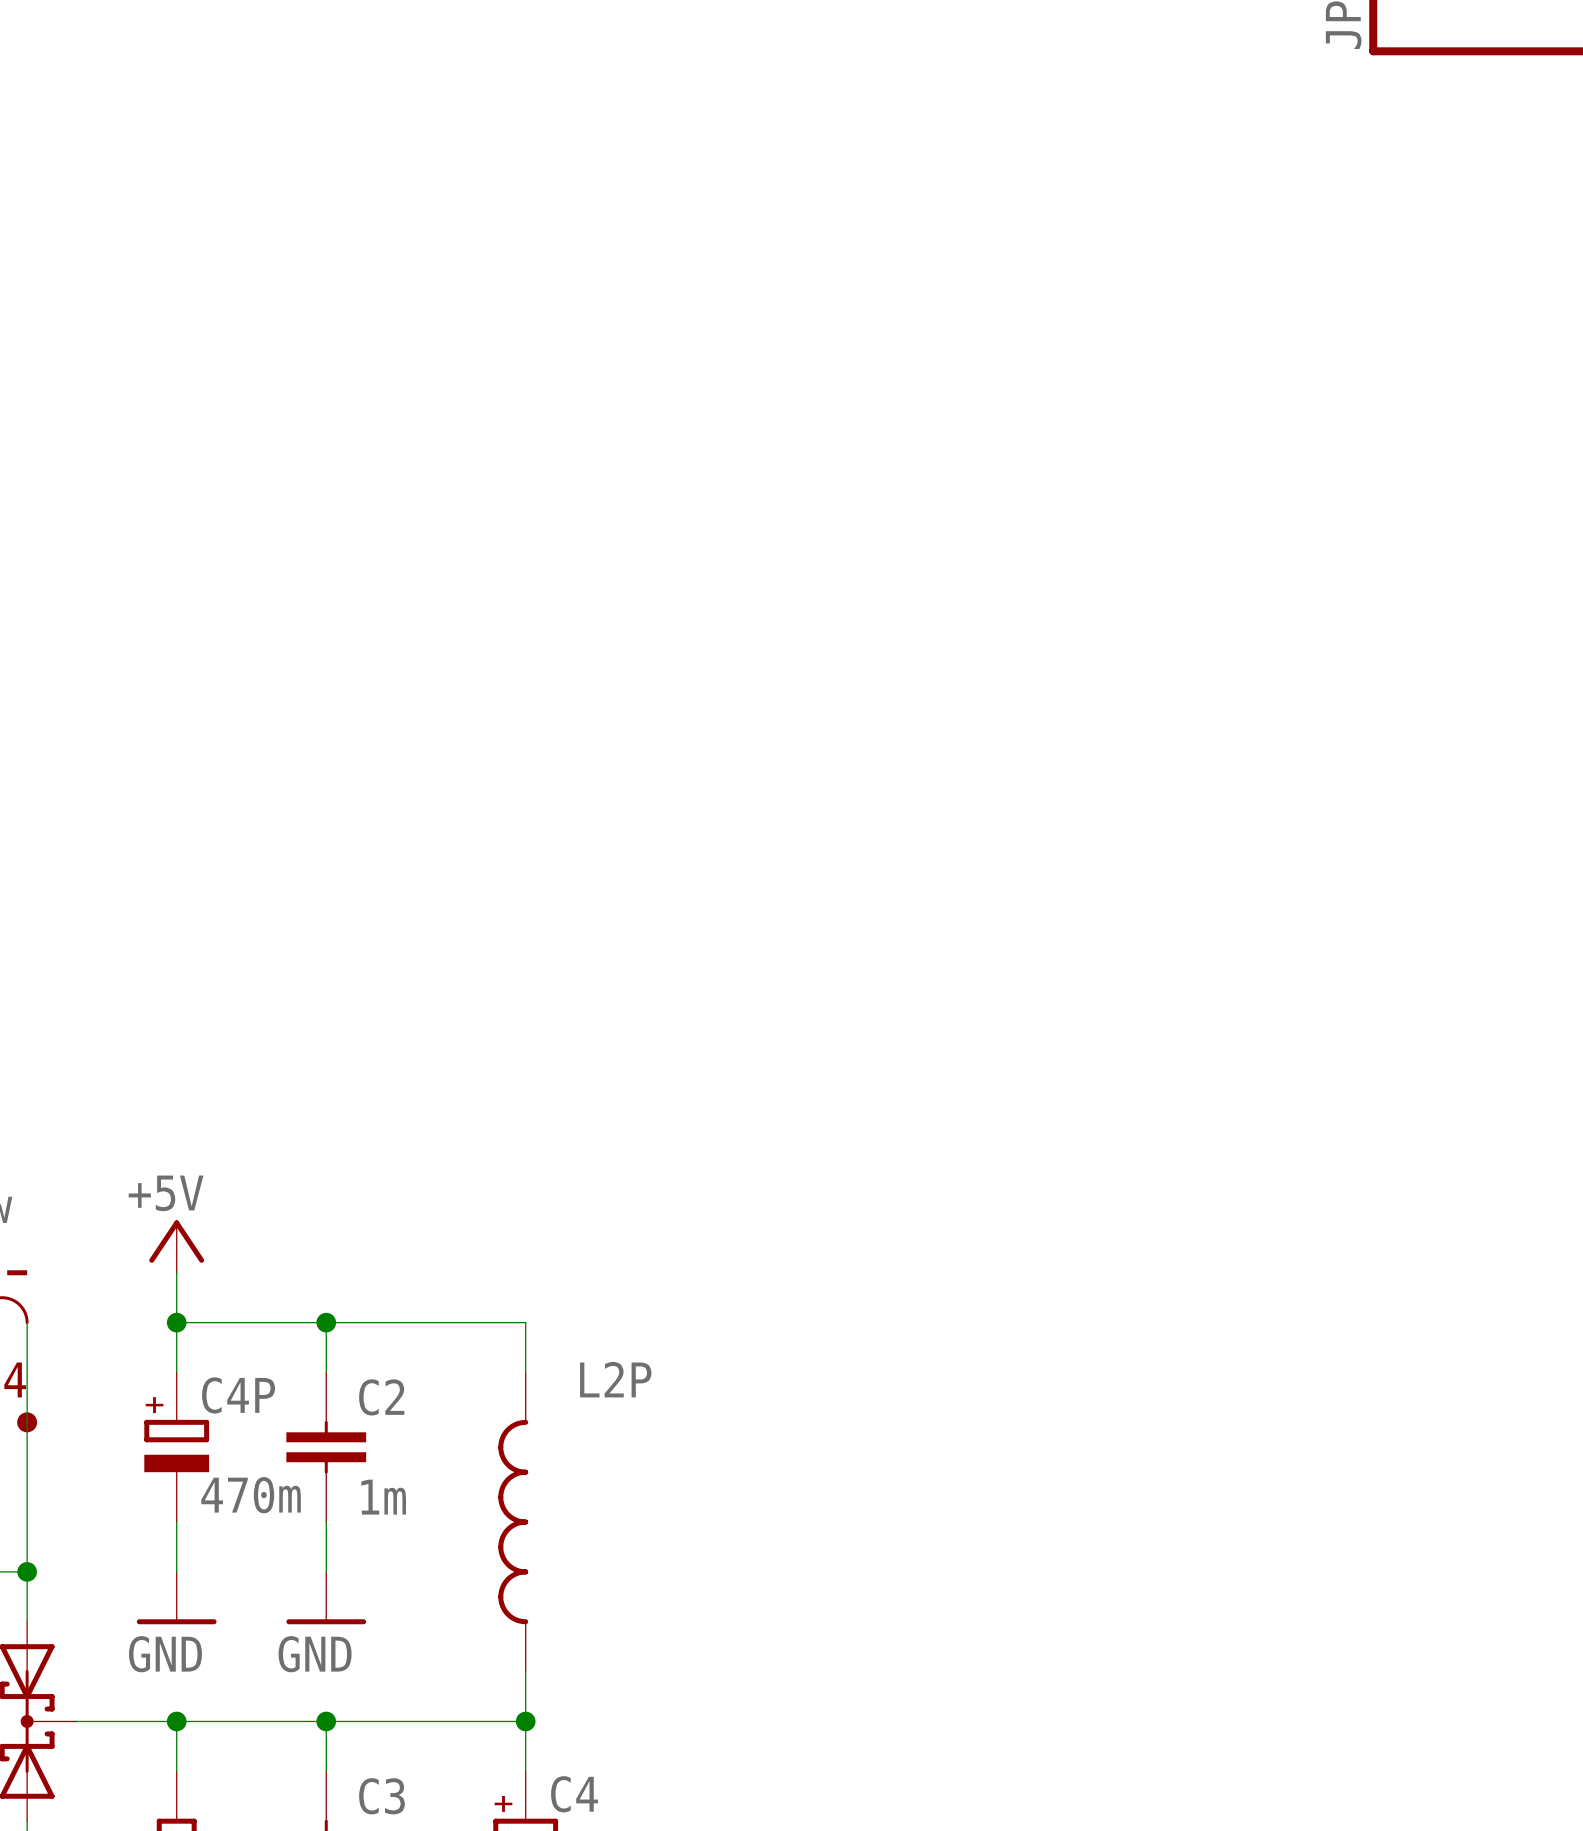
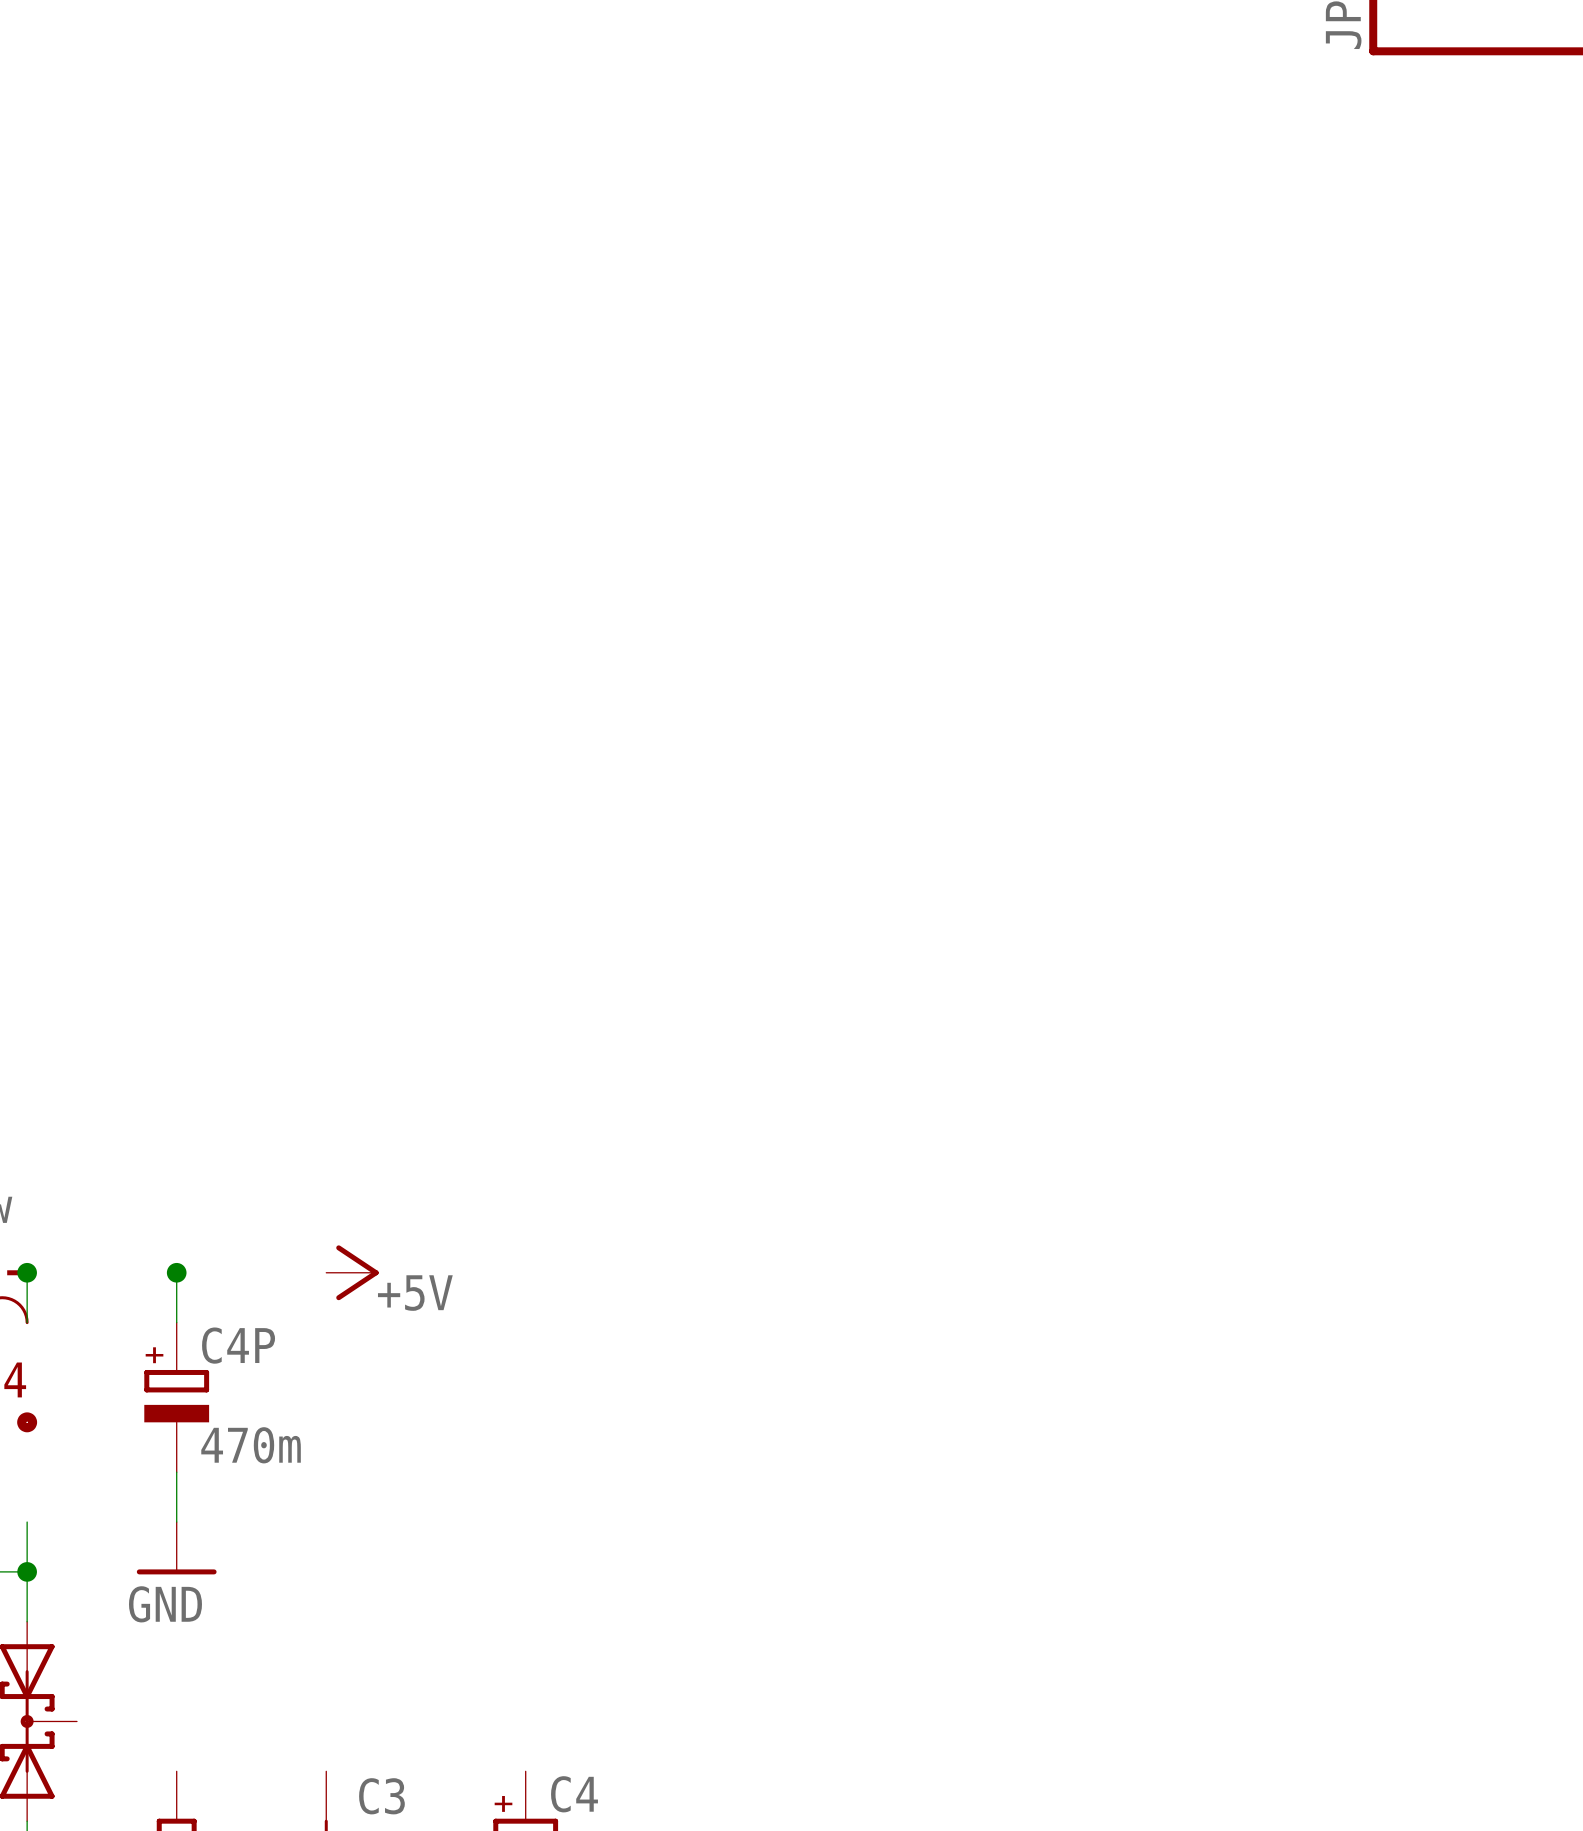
power symbol rotation: 0° (176, 1241) -> 90° clockwise (357, 1272)
power symbol position: +5V (176, 1246) -> +5V (352, 1272)
junction: none -> (27, 1272)
wire: (27, 1322) (27, 1522) -> (27, 1322) (27, 1272)
junction position: (176, 1322) -> (176, 1272)
wire: (326, 1322) (326, 1372) -> none
junction: (326, 1322) -> none
wire: (176, 1372) (176, 1322) (525, 1322) (525, 1372) -> none
C4P position: (176, 1447) -> (176, 1397)
C2: 1m (326, 1447) -> none
wire: (326, 1522) (326, 1571) -> none
L2P: (513, 1522) -> none
power symbol position: GND (176, 1598) -> GND (176, 1548)
power symbol: GND (326, 1598) -> none
wire: (525, 1671) (525, 1771) -> none
wire: (76, 1721) (525, 1721) -> none
wire: (176, 1721) (176, 1771) -> none
junction: (176, 1721) -> none
wire: (326, 1721) (326, 1771) -> none
junction: (326, 1721) -> none
junction: (525, 1721) -> none

